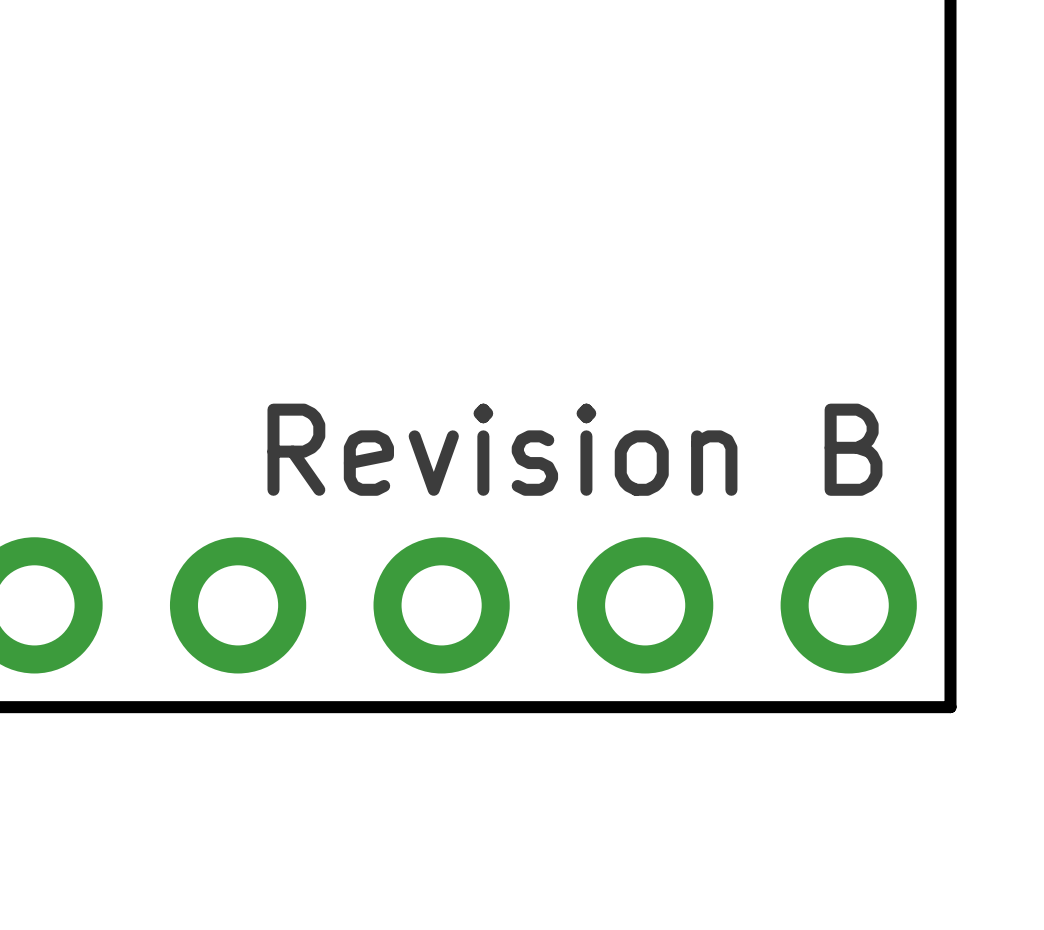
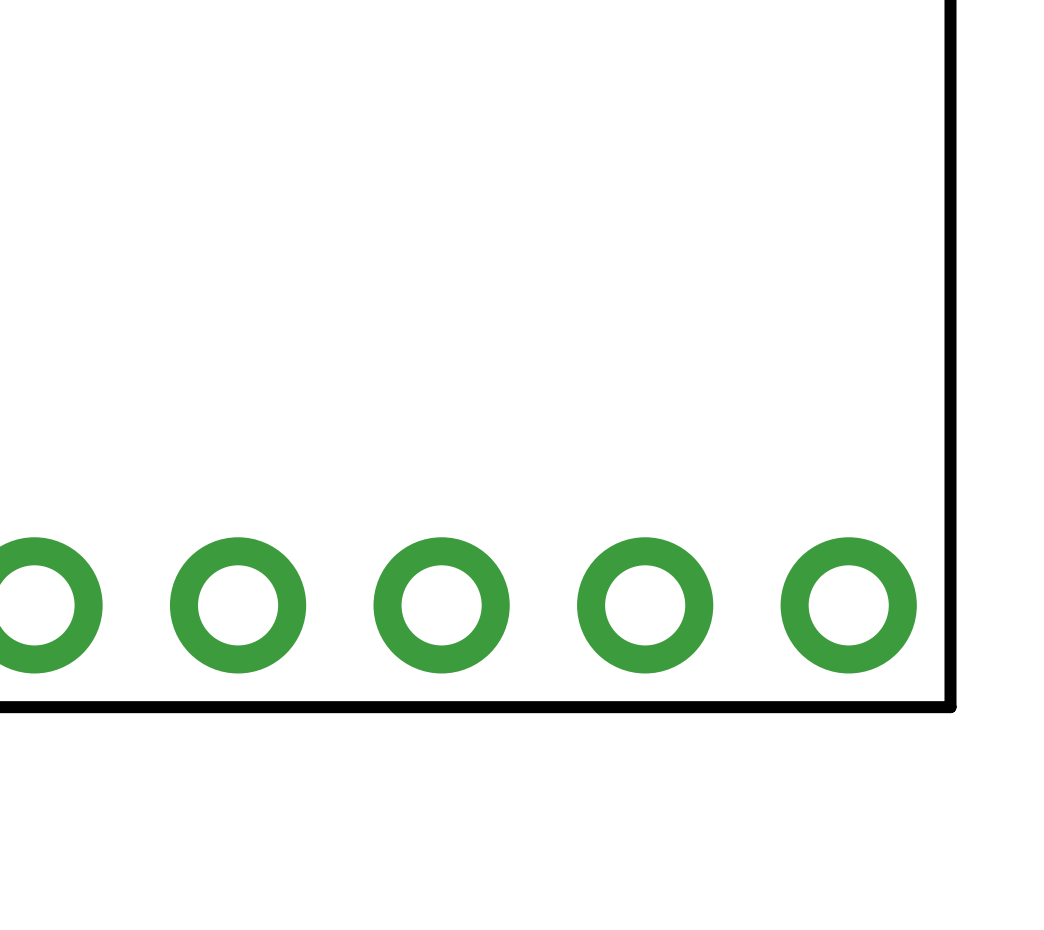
text: Revision B (574, 449) -> none

